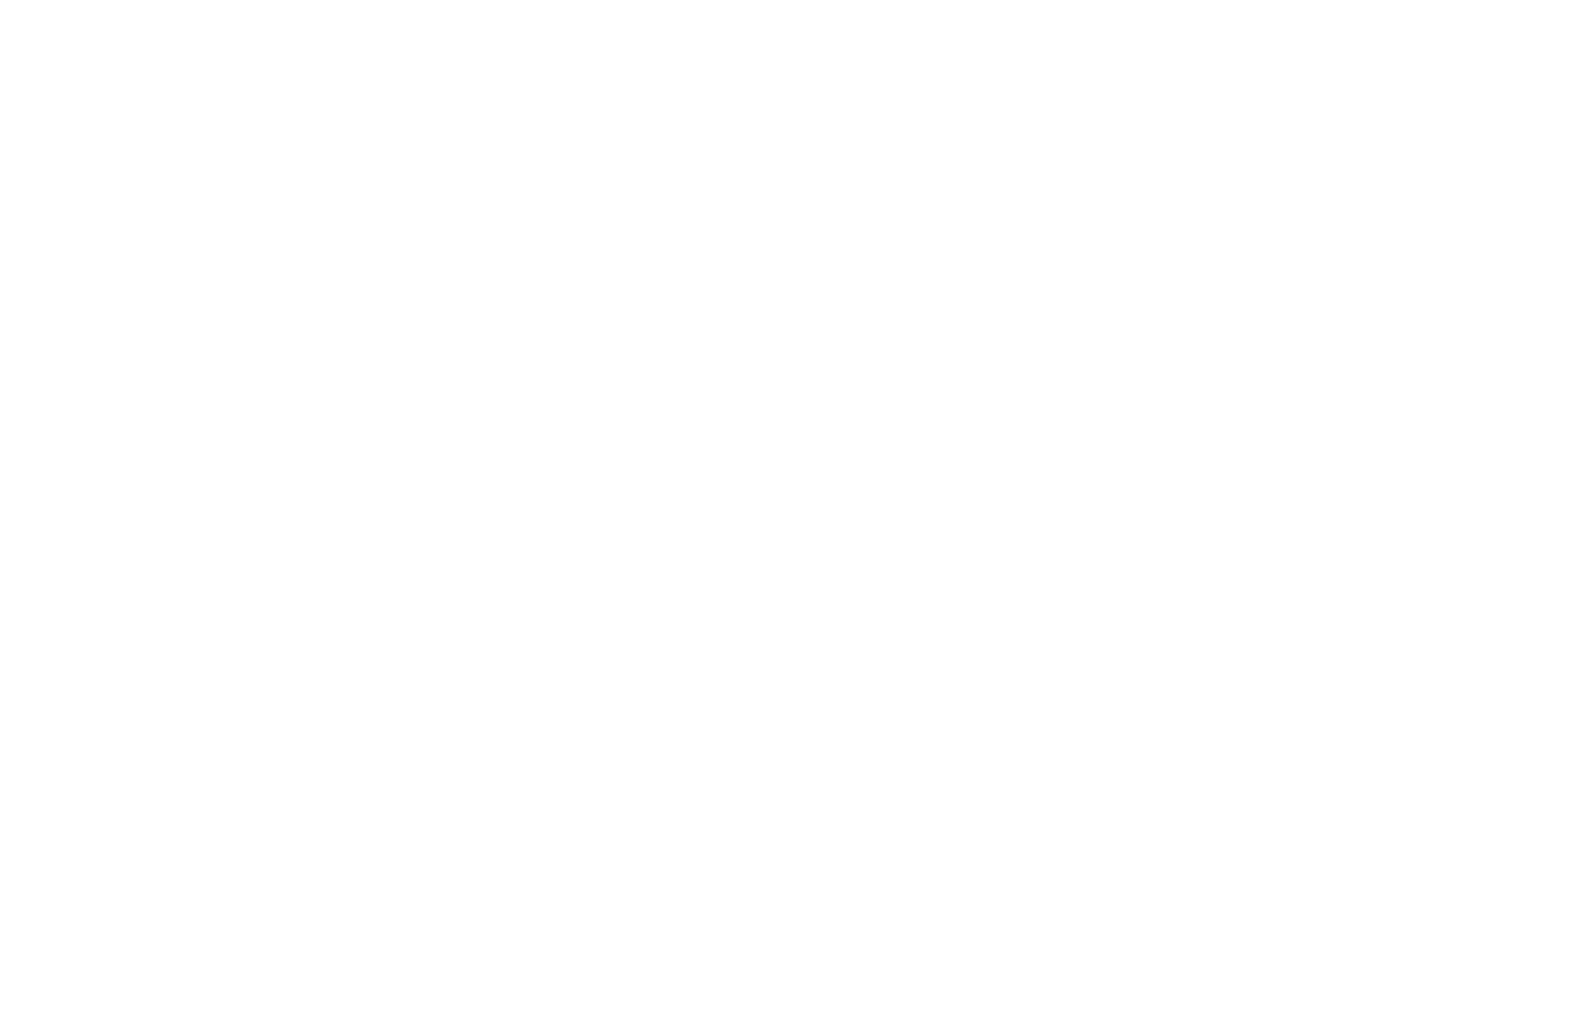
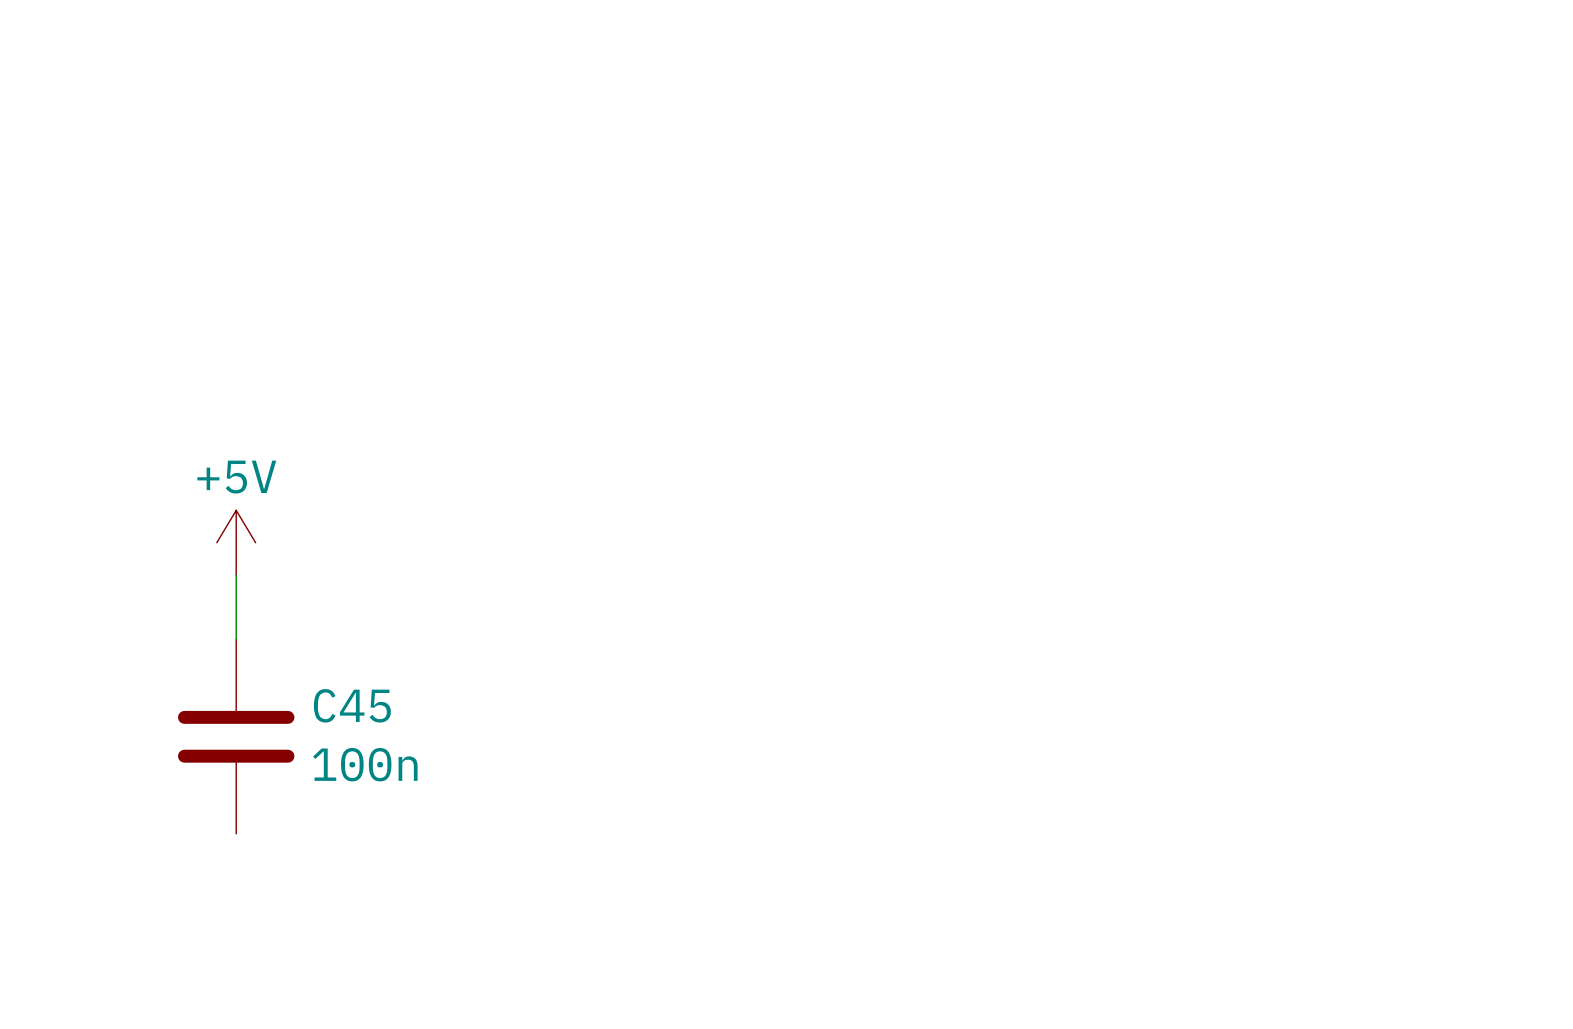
power symbol: none -> +5V (236, 542)
wire: none -> (236, 575) (236, 639)
C45: none -> 100n (236, 736)

